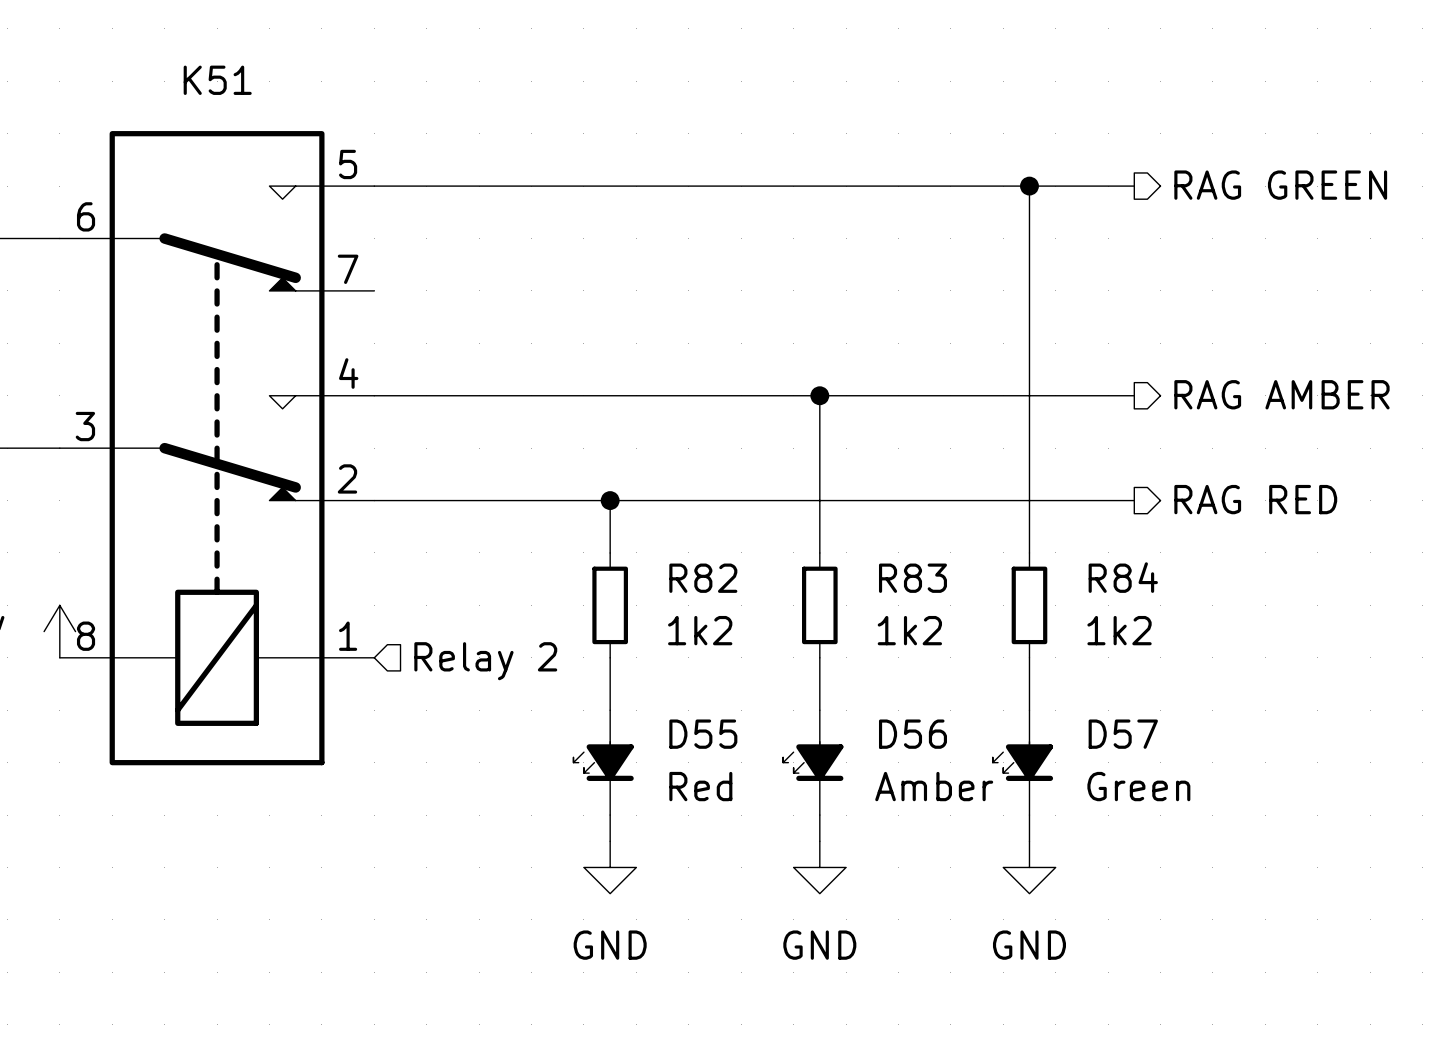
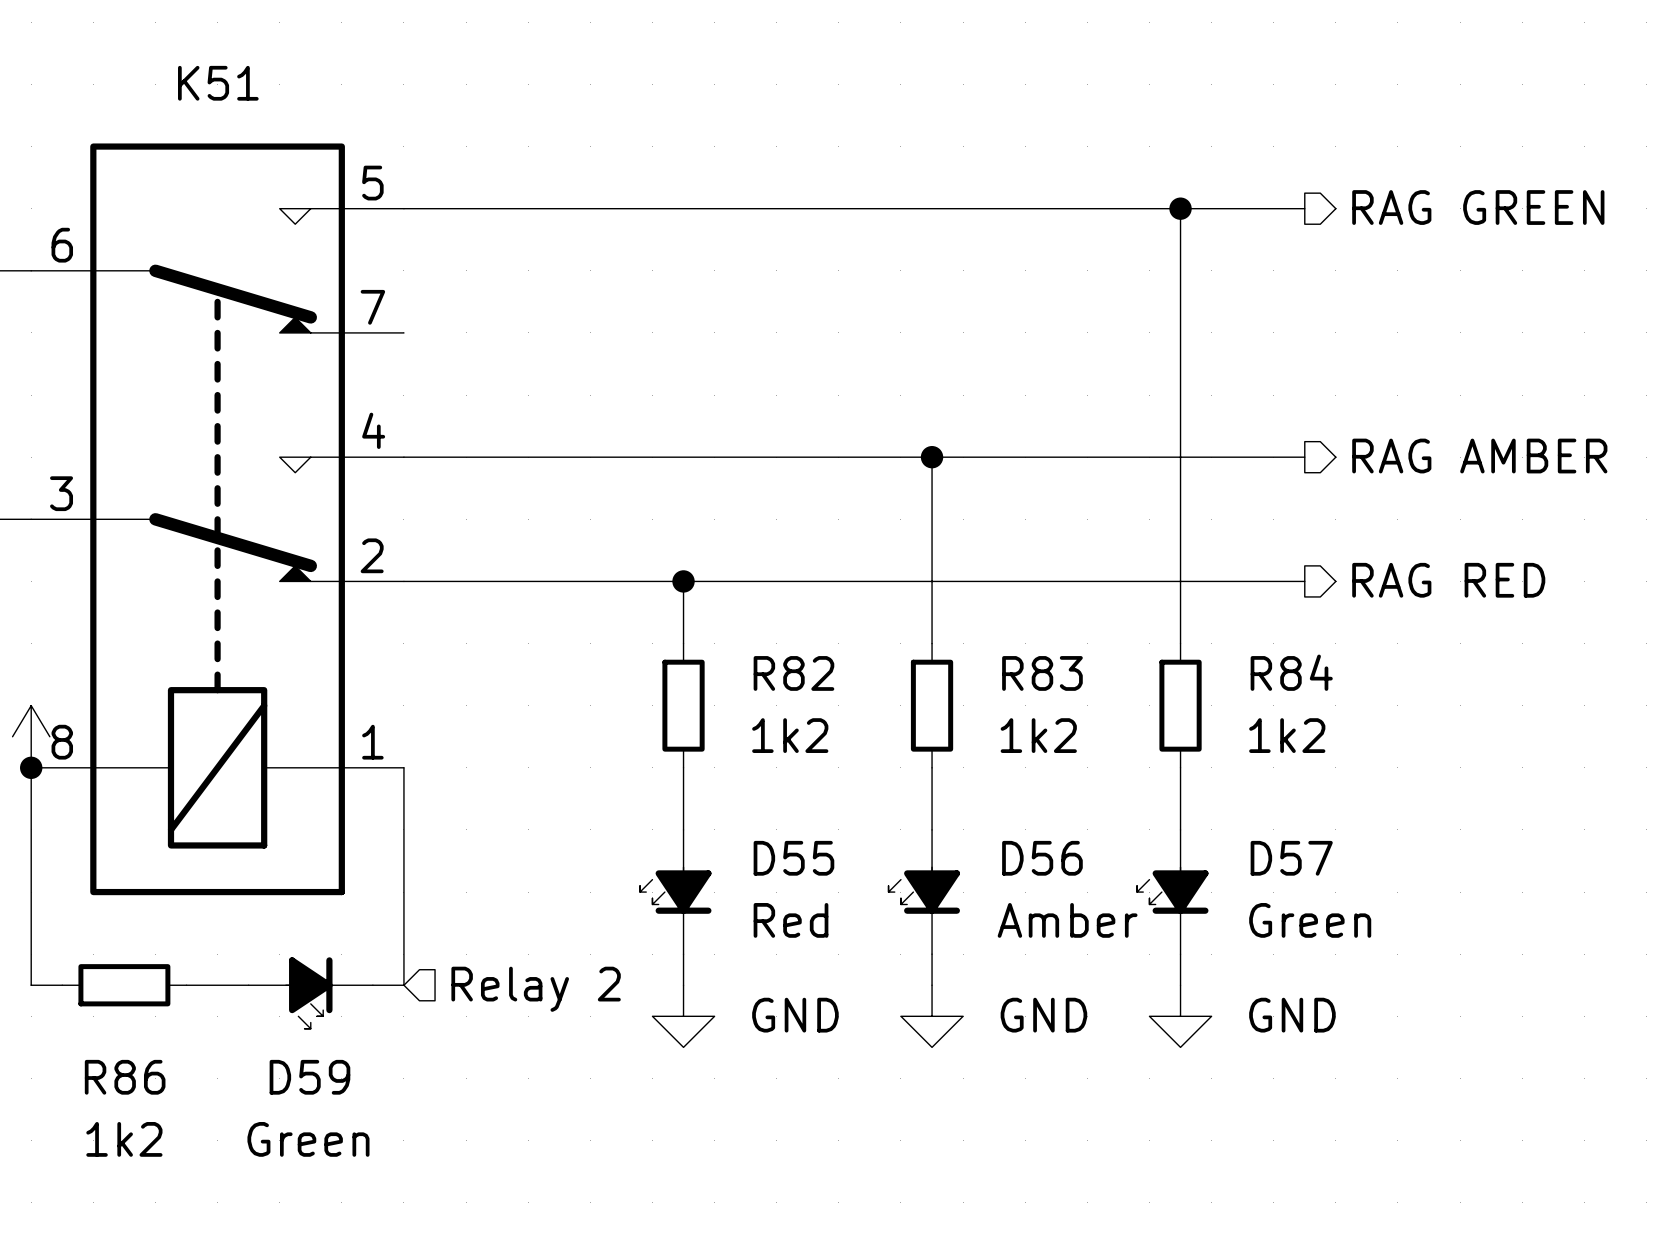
wire: none -> (31, 767) (31, 985) (62, 985)
junction: none -> (31, 767)
wire: none -> (403, 767) (403, 985) (372, 985)
hierarchical label position: Relay 2 (485, 661) -> Relay 2 (536, 989)
R86: none -> 1k2 (124, 985)
wire: none -> (186, 985) (248, 985)
D59: none -> Green (310, 993)
power symbol text position: GND (610, 945) -> GND (795, 1015)
power symbol text position: GND (819, 945) -> GND (1043, 1015)
power symbol text position: GND (1029, 945) -> GND (1292, 1015)

